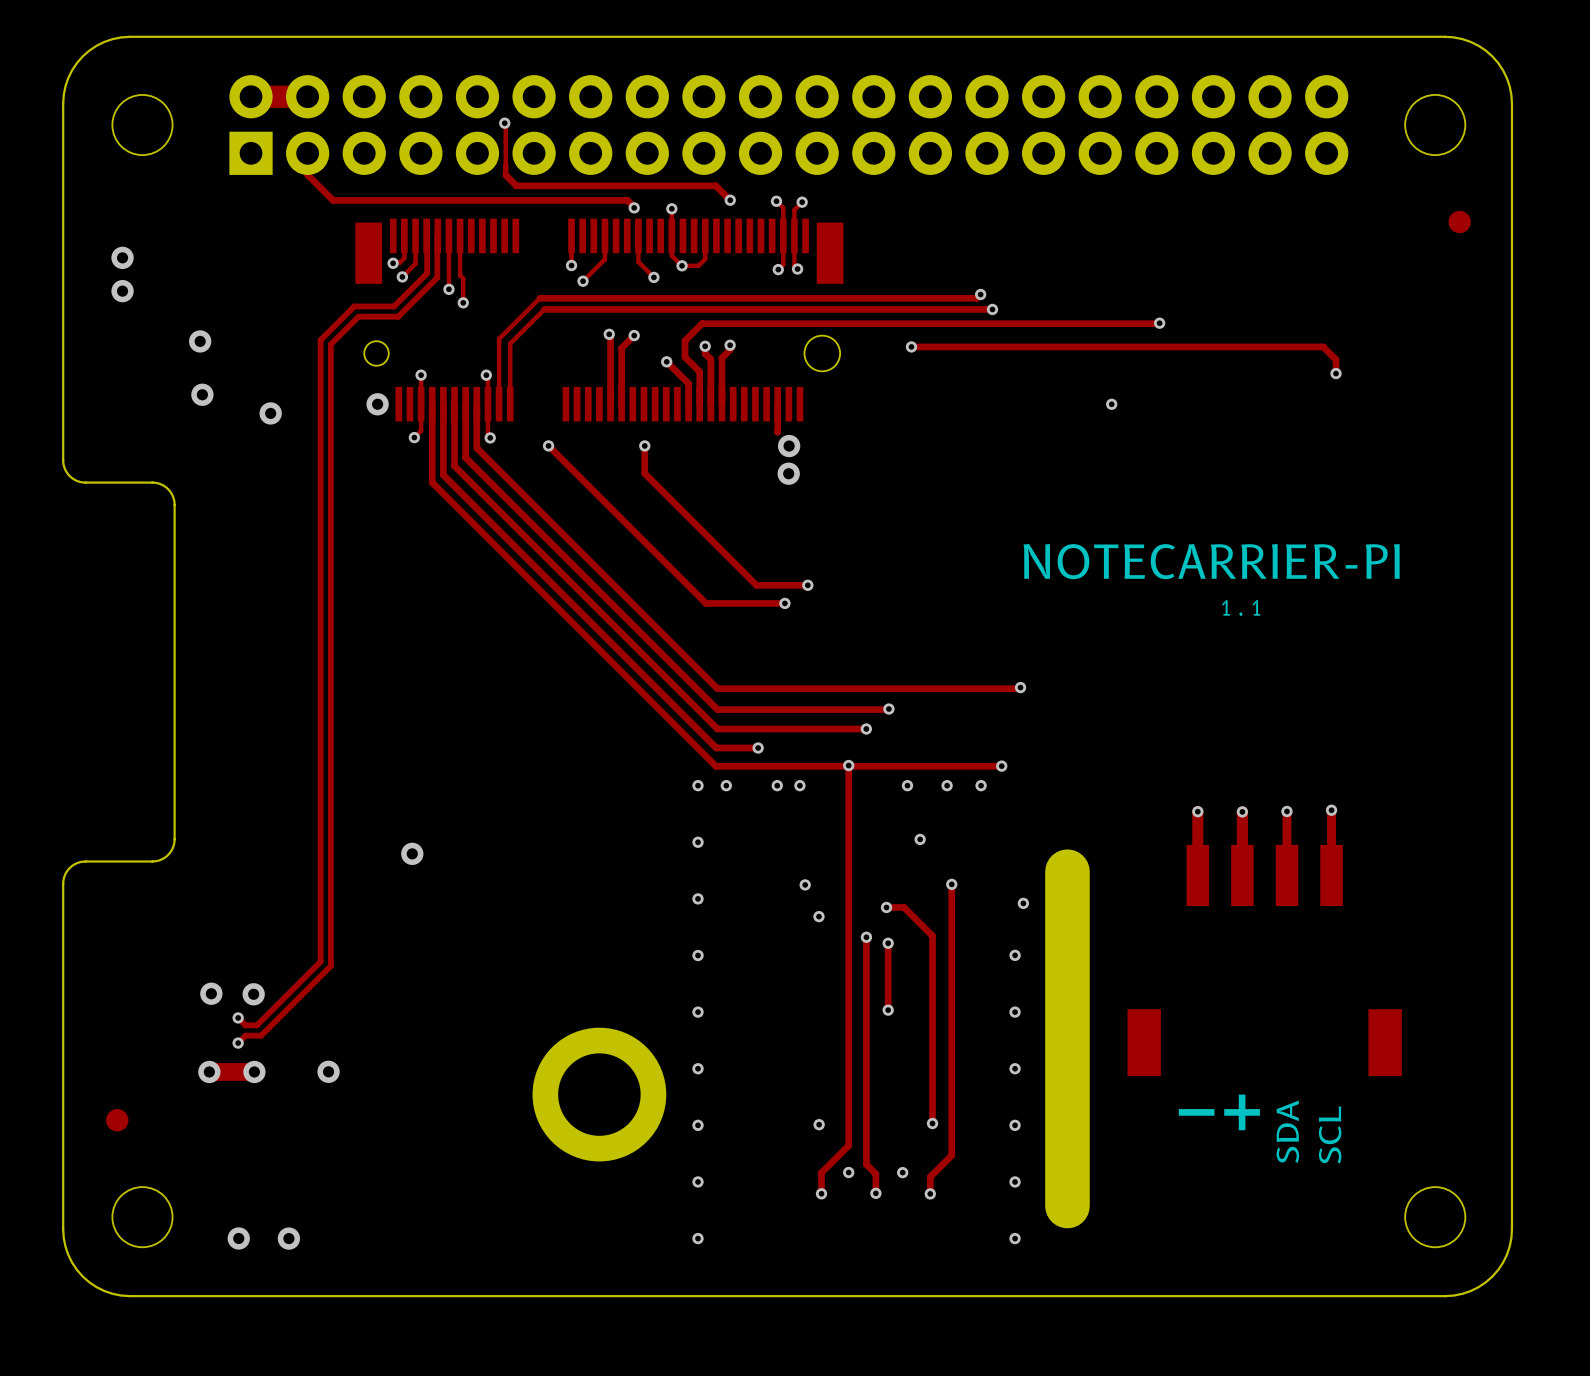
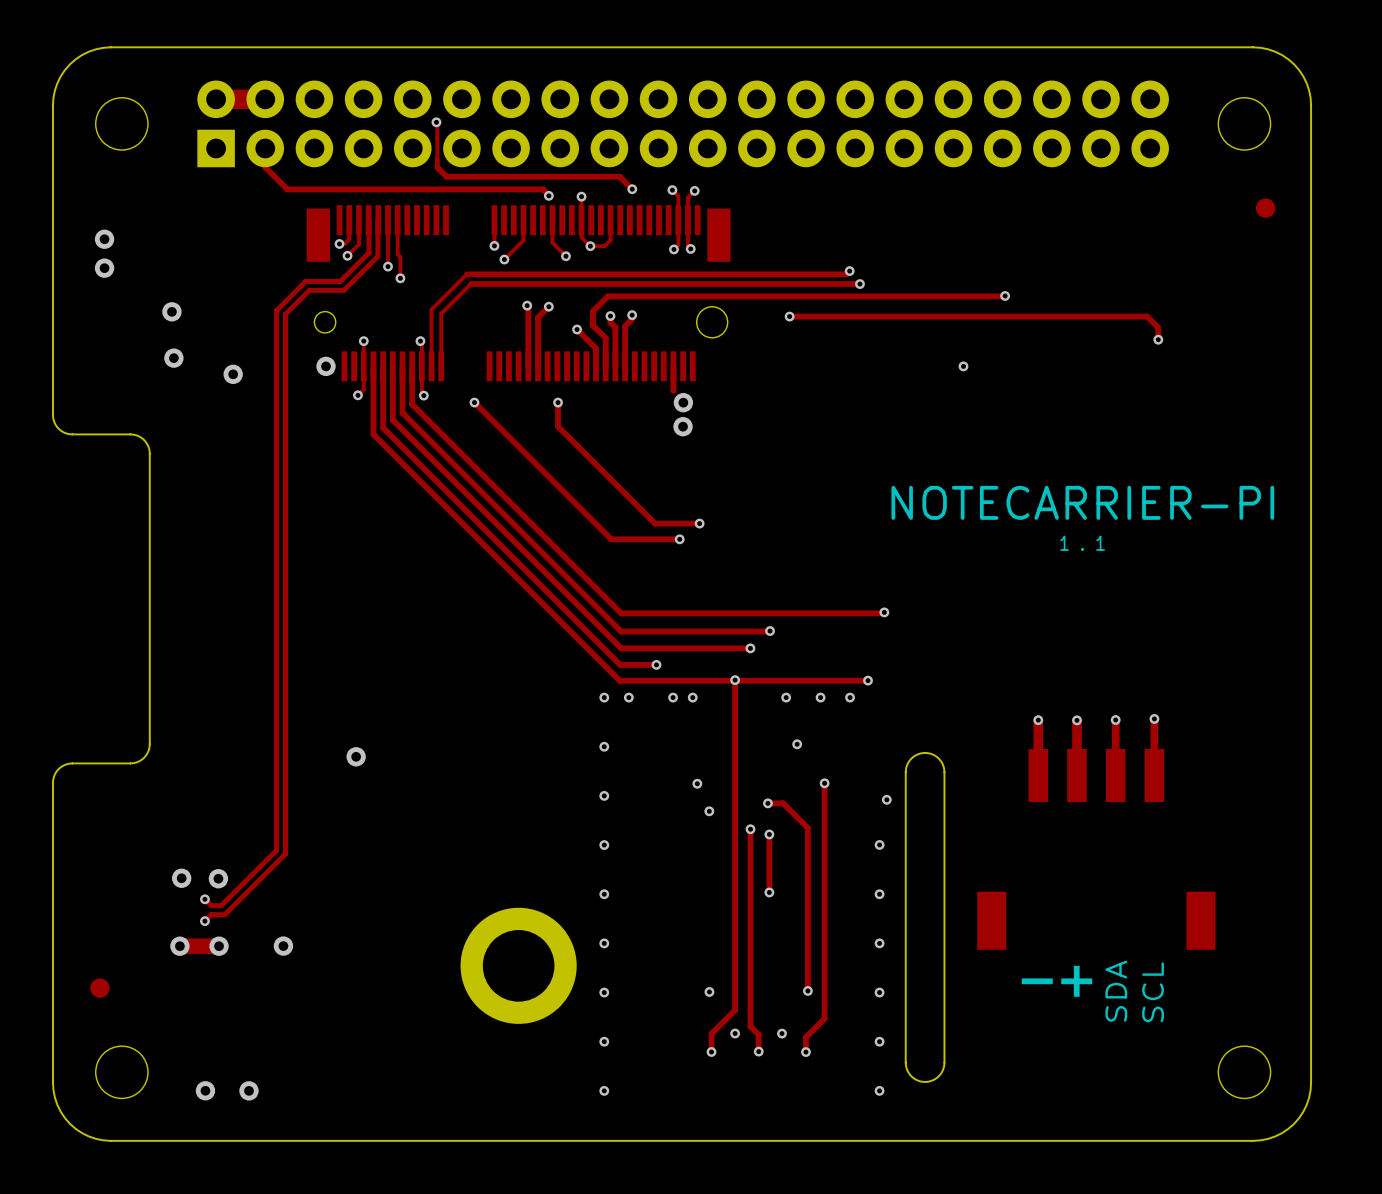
board edge: none -> (905, 772) (905, 1065) (913, 1077) (927, 1081) (938, 1076) (944, 1062) (944, 769) (938, 758) (925, 752) (911, 758) (905, 772)
board edge: (1067, 871) (1067, 1206) -> none

